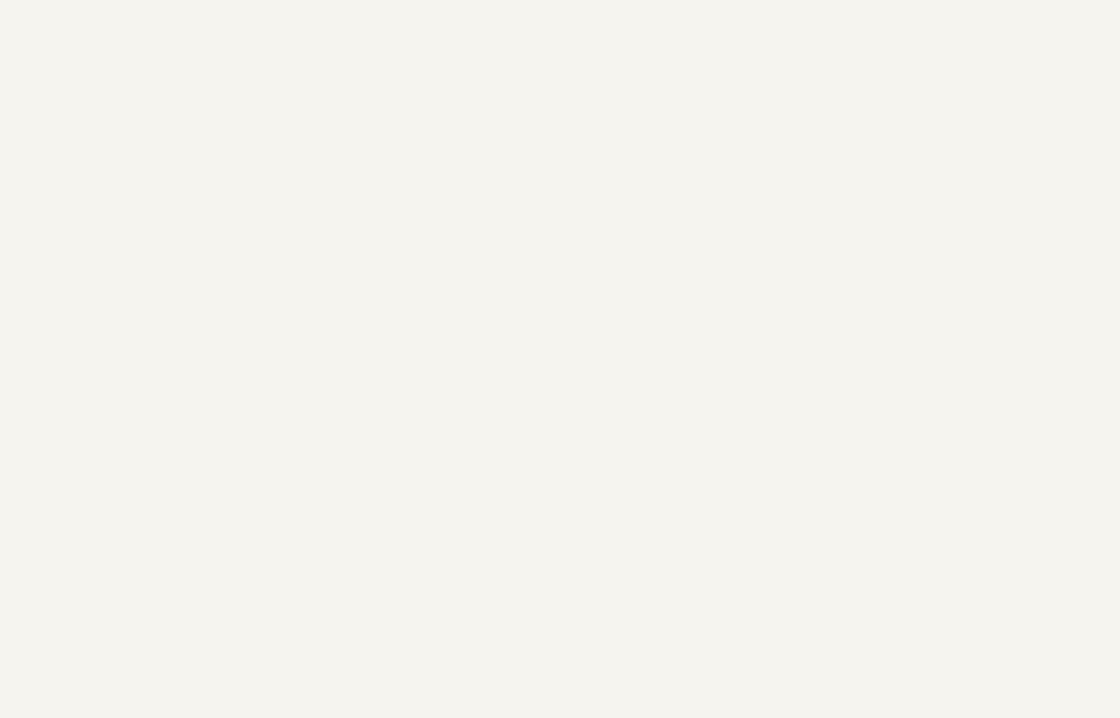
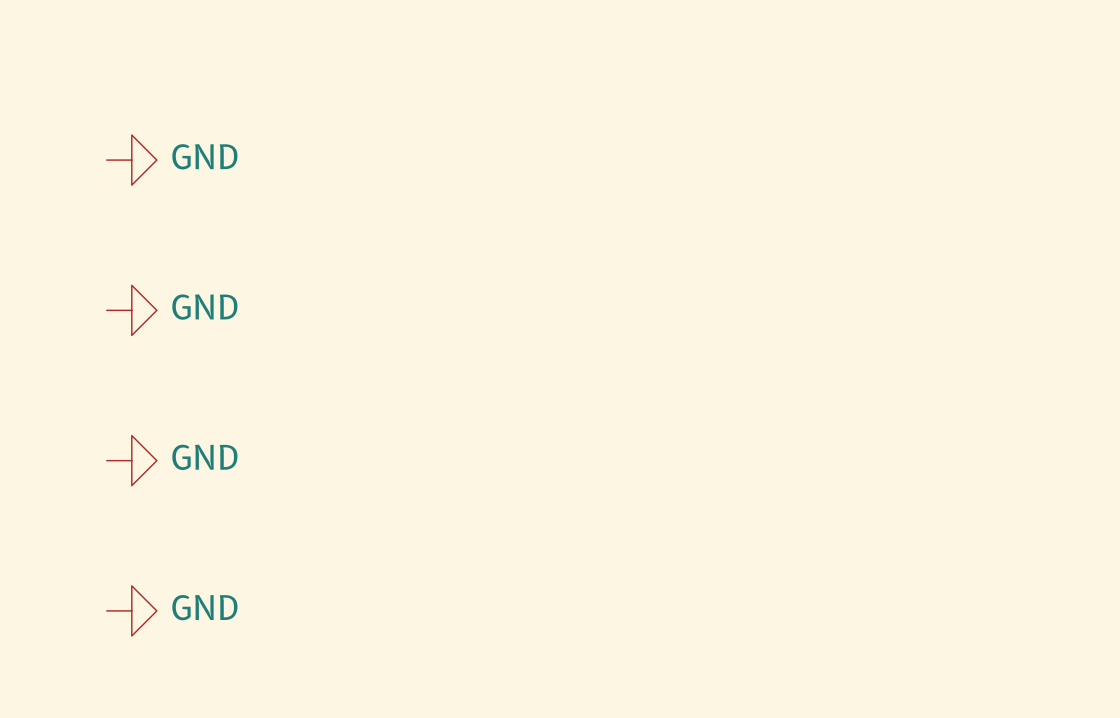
power symbol: none -> GND (131, 160)
power symbol: none -> GND (131, 310)
power symbol: none -> GND (131, 460)
power symbol: none -> GND (131, 610)

